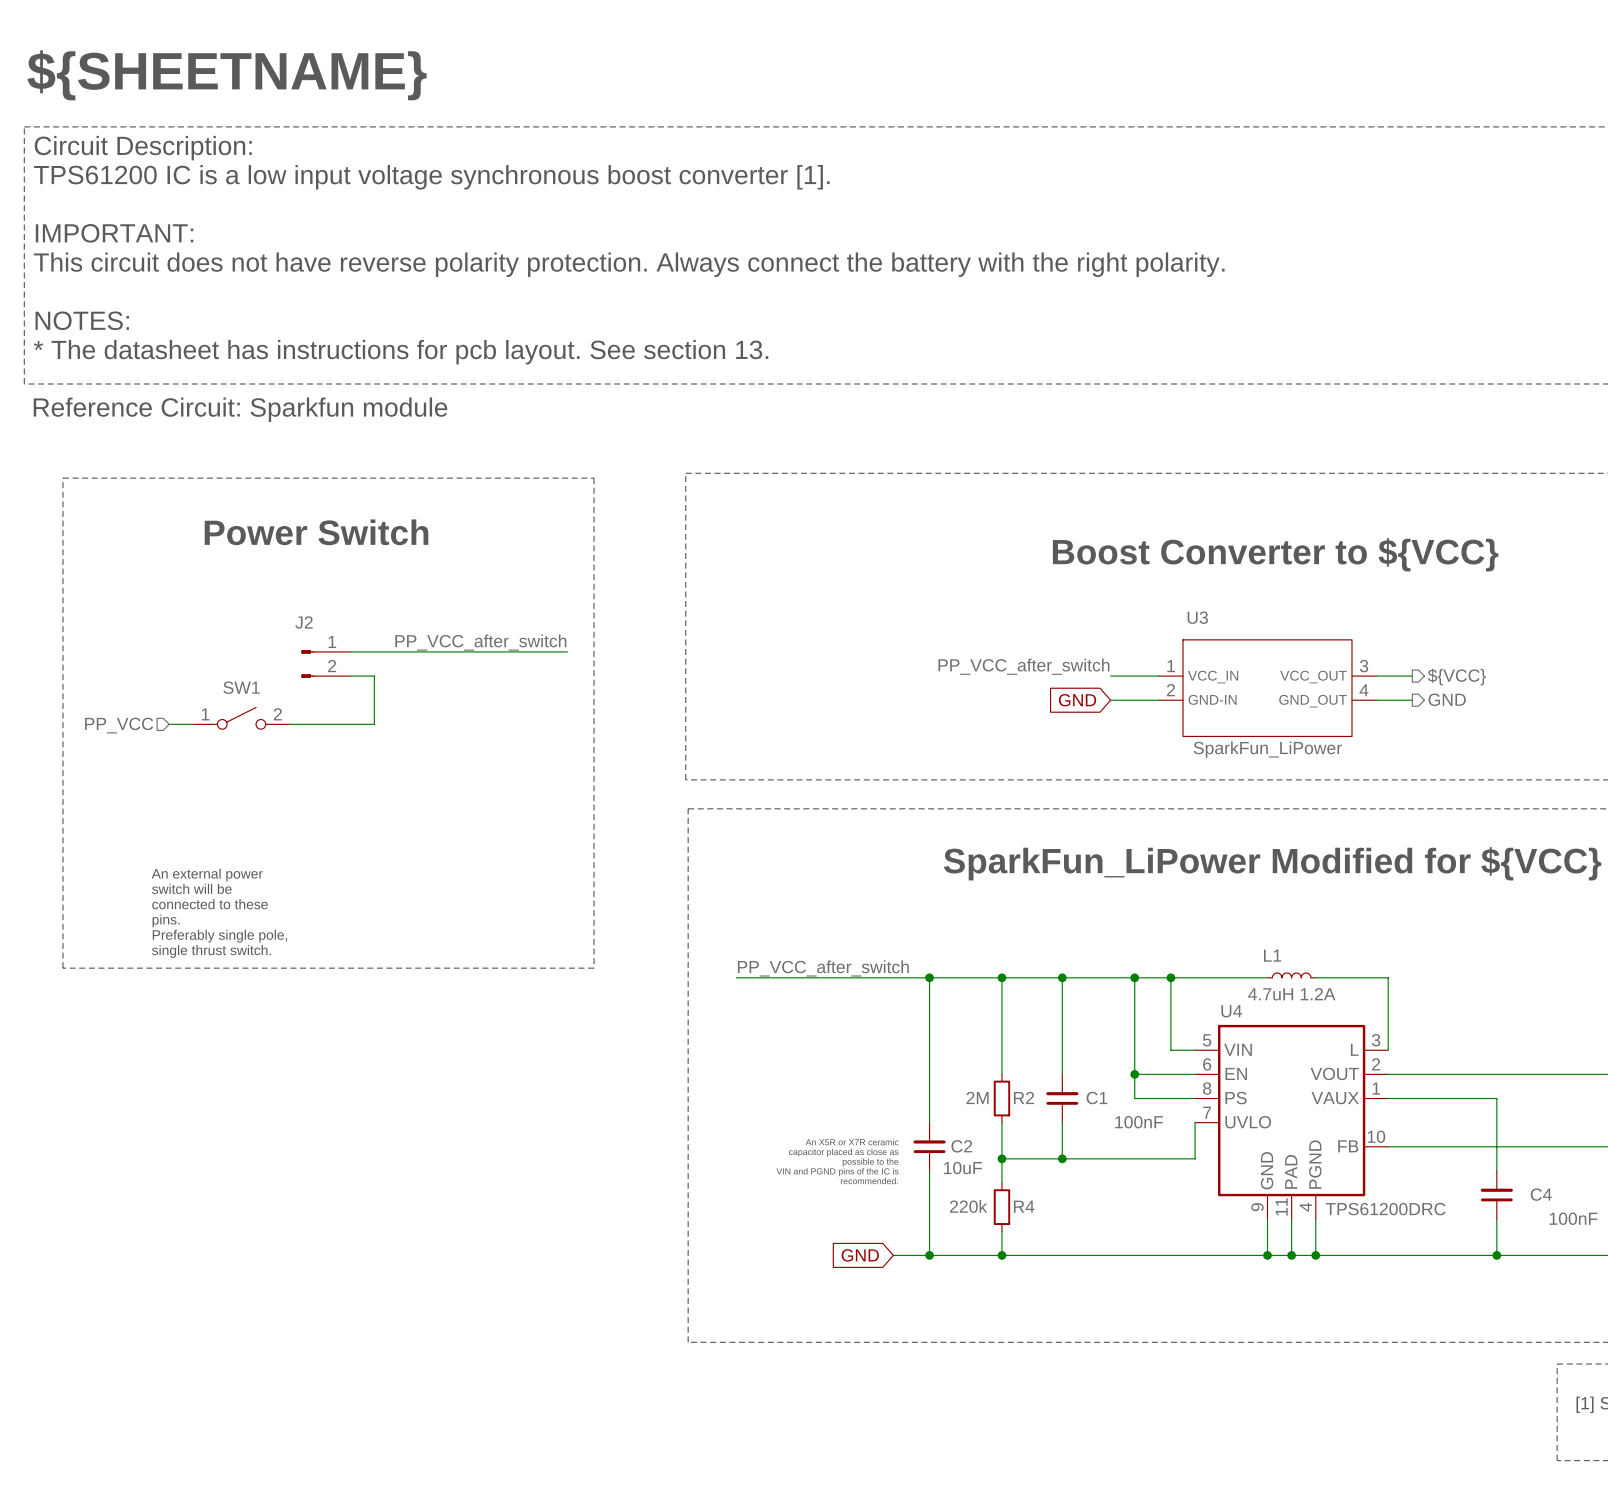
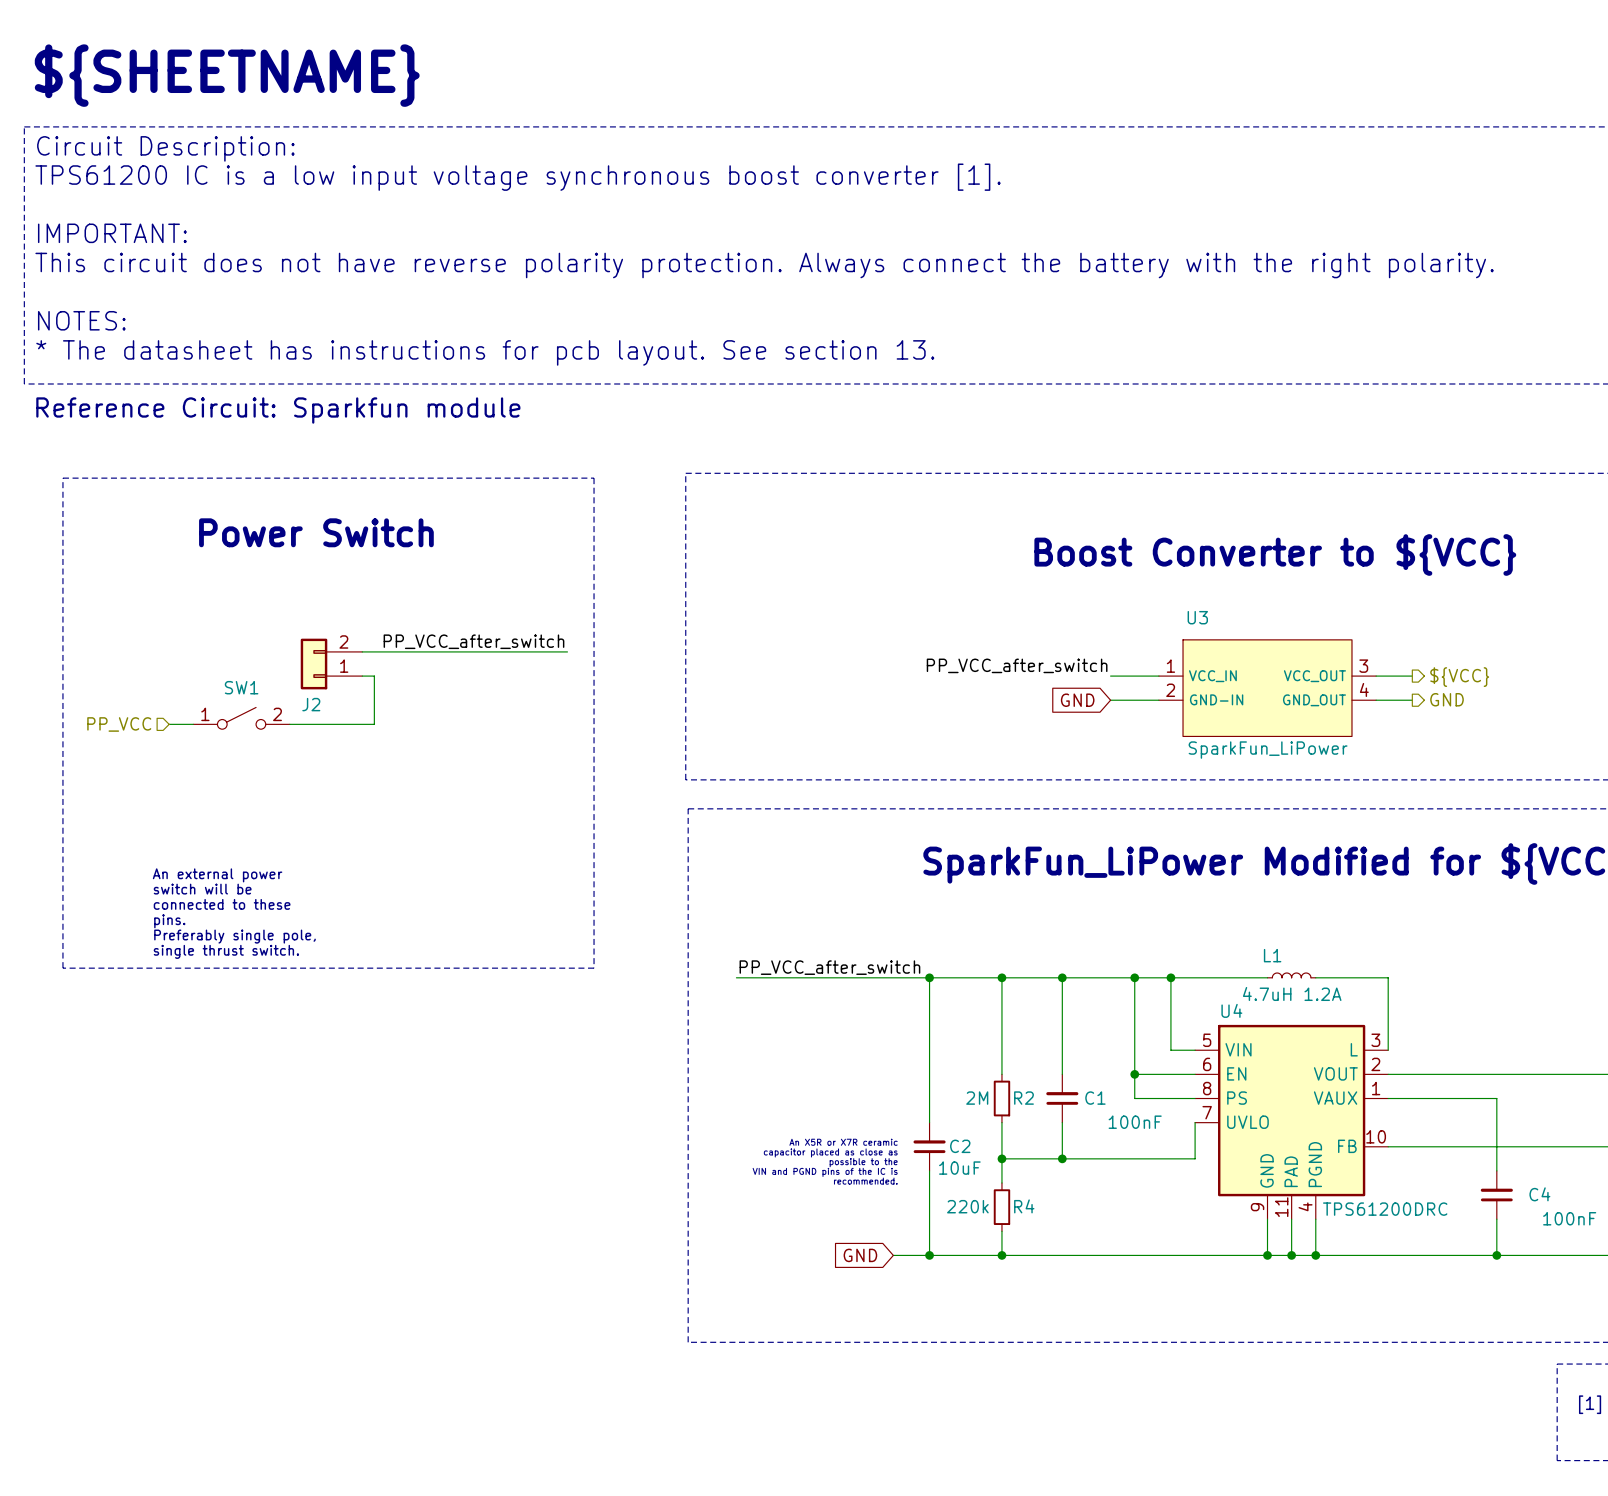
J2 name position: J2 (304, 622) -> J2 (311, 704)
J2 symbol: [301, 650, 351, 679] -> [300, 638, 363, 690]

